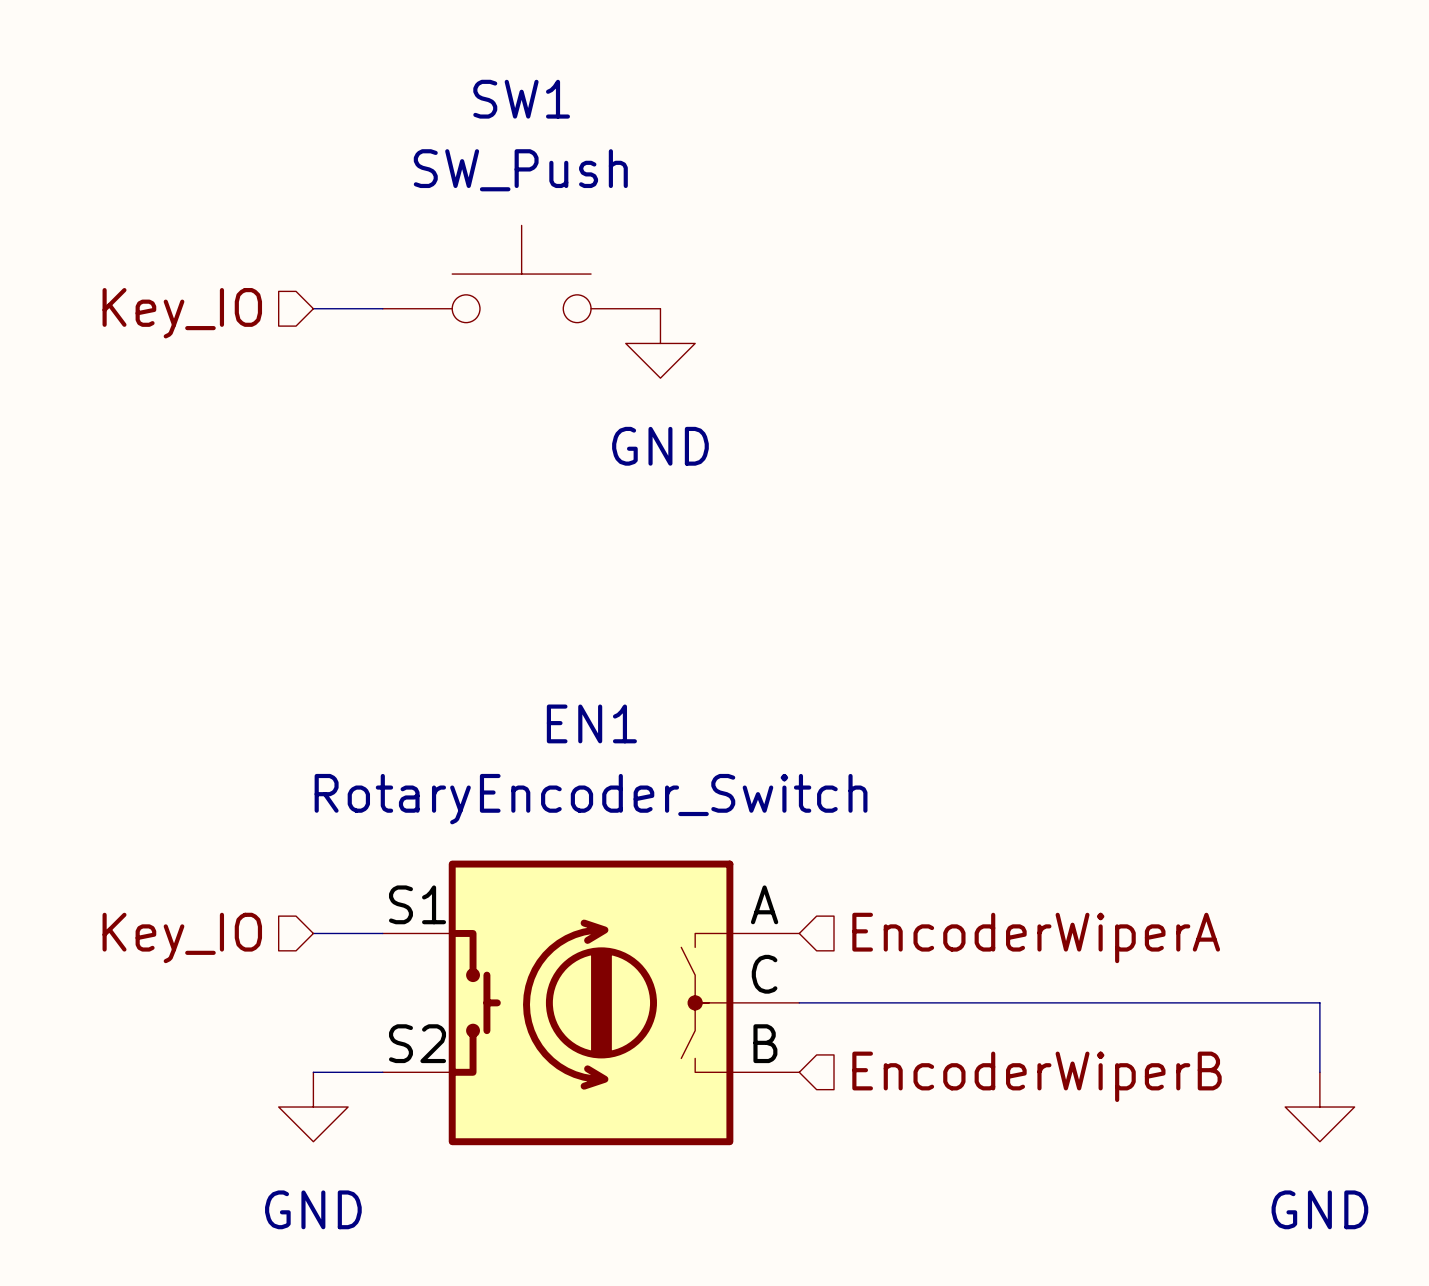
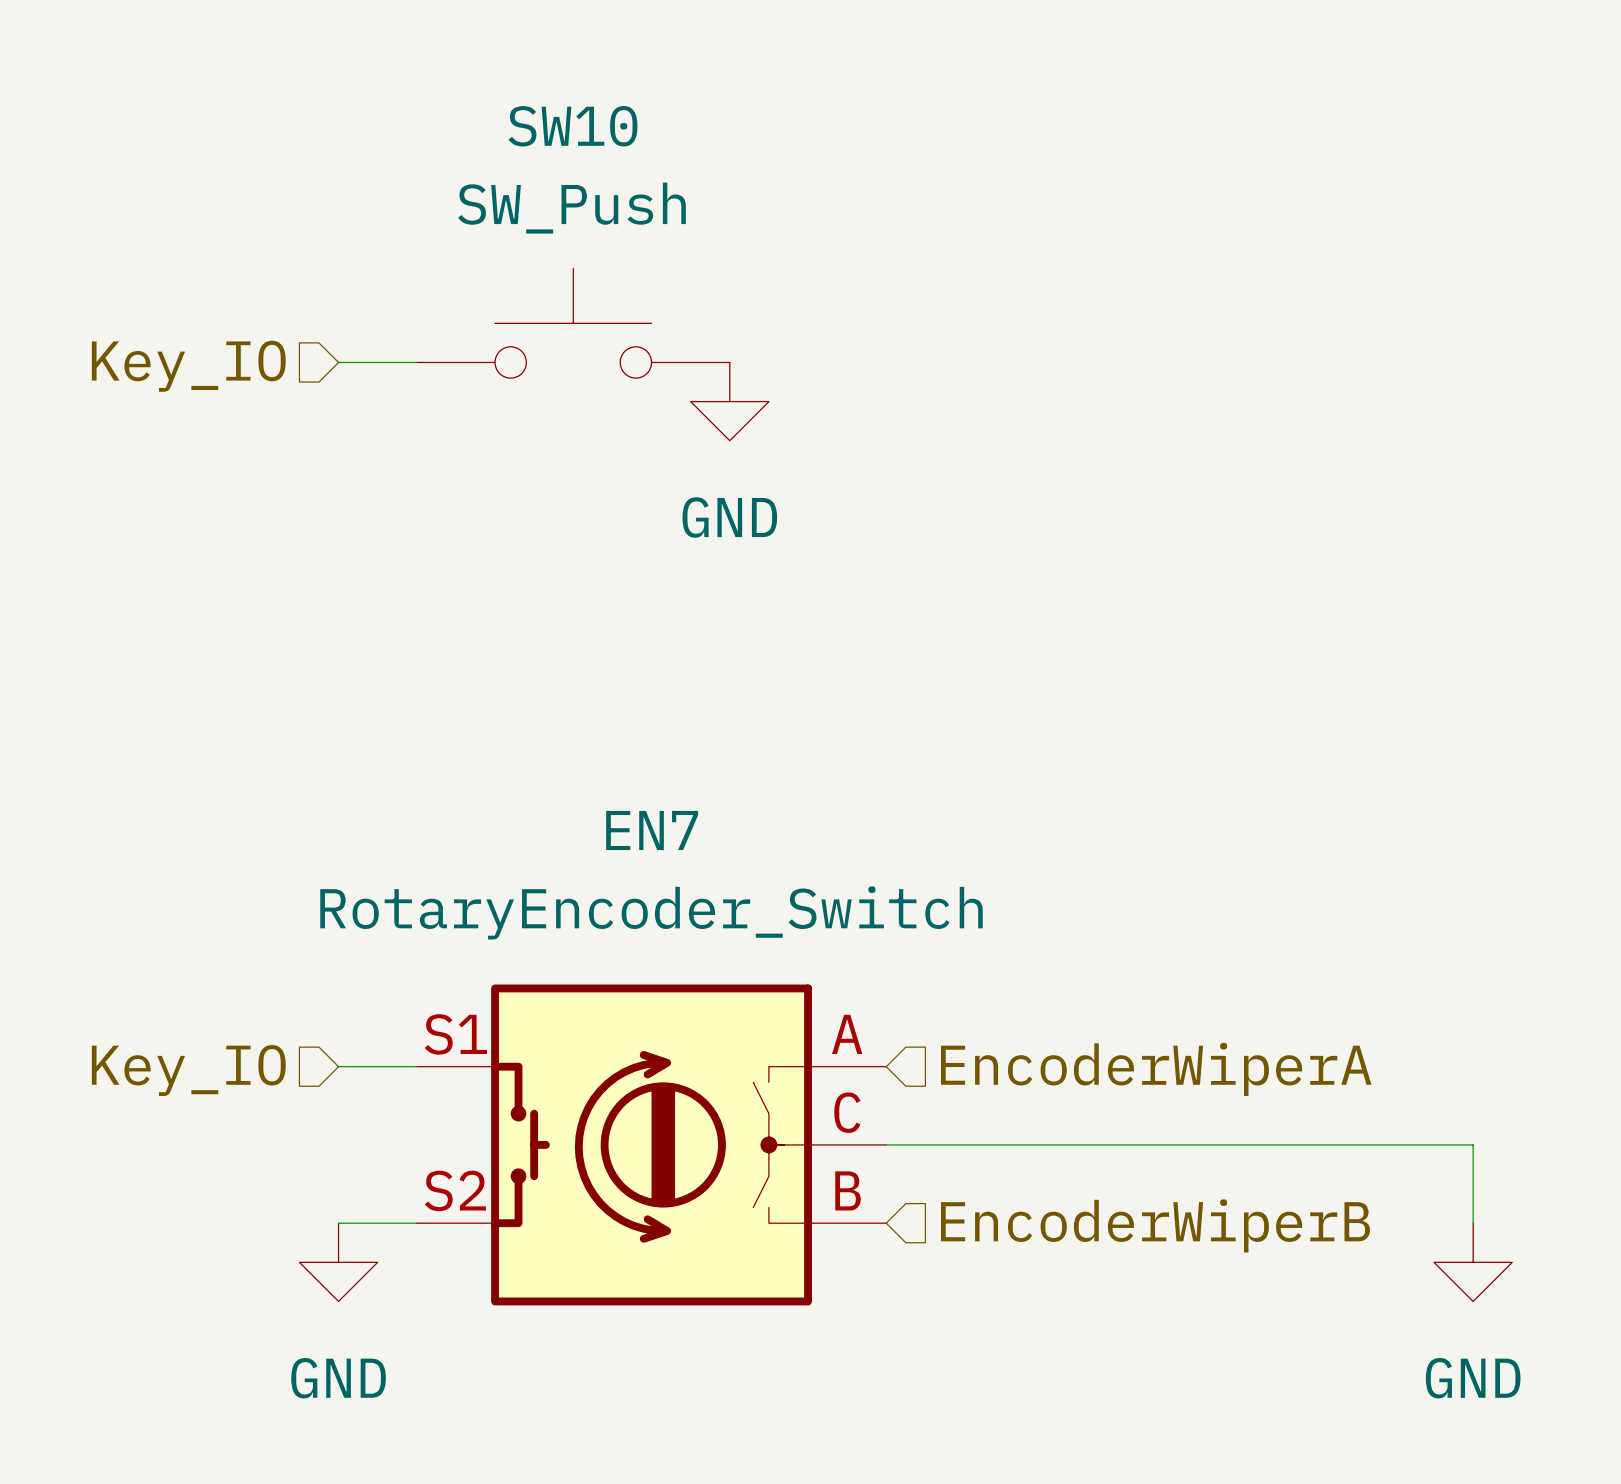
SW1 name: SW1 (521, 99) -> SW10 (572, 126)
EN1 name: EN1 (591, 723) -> EN7 (652, 830)

